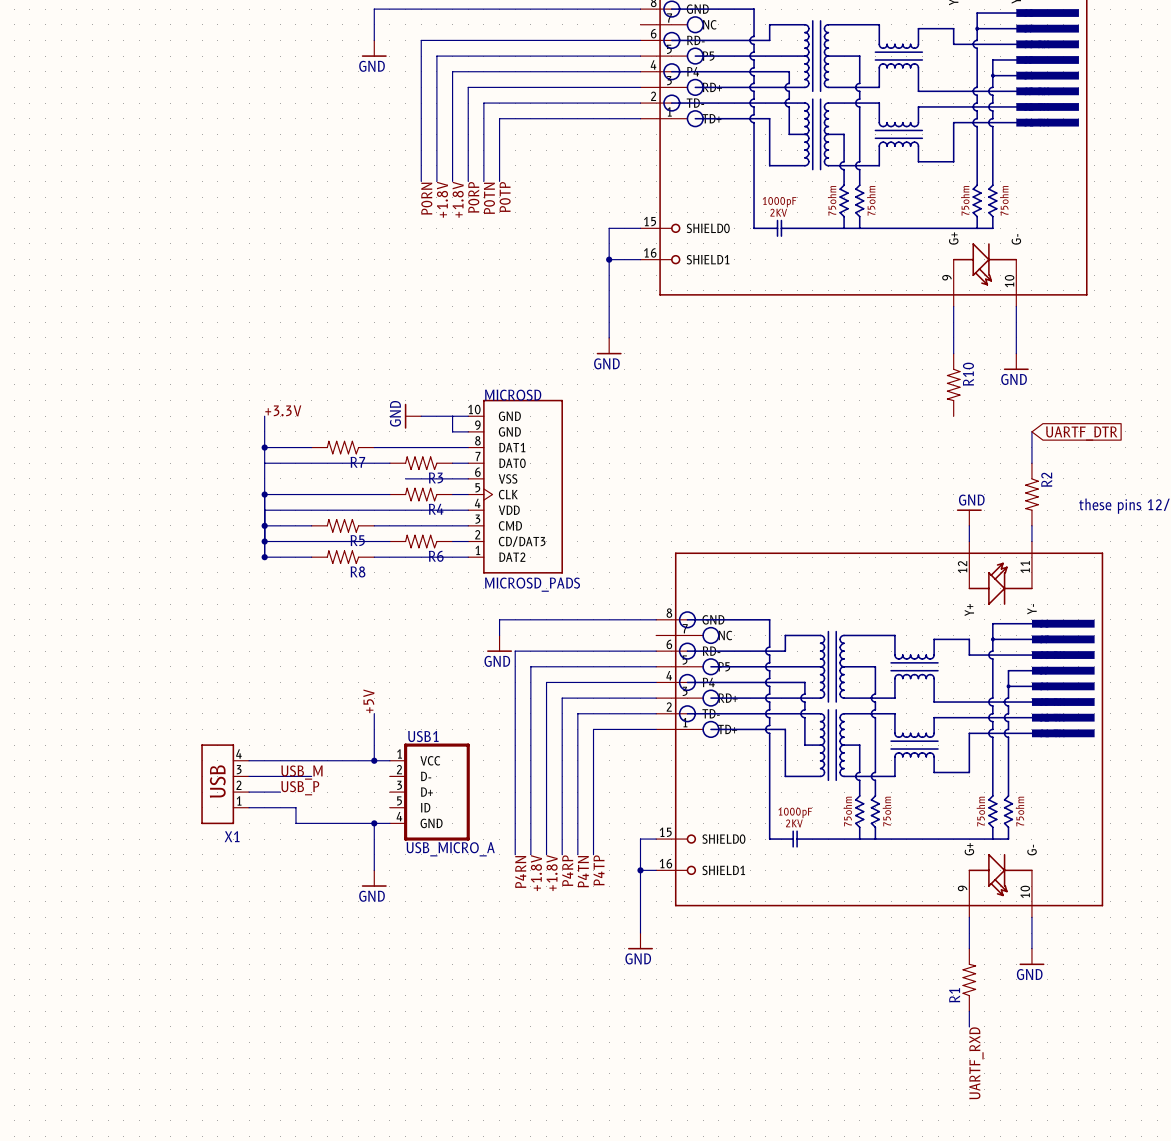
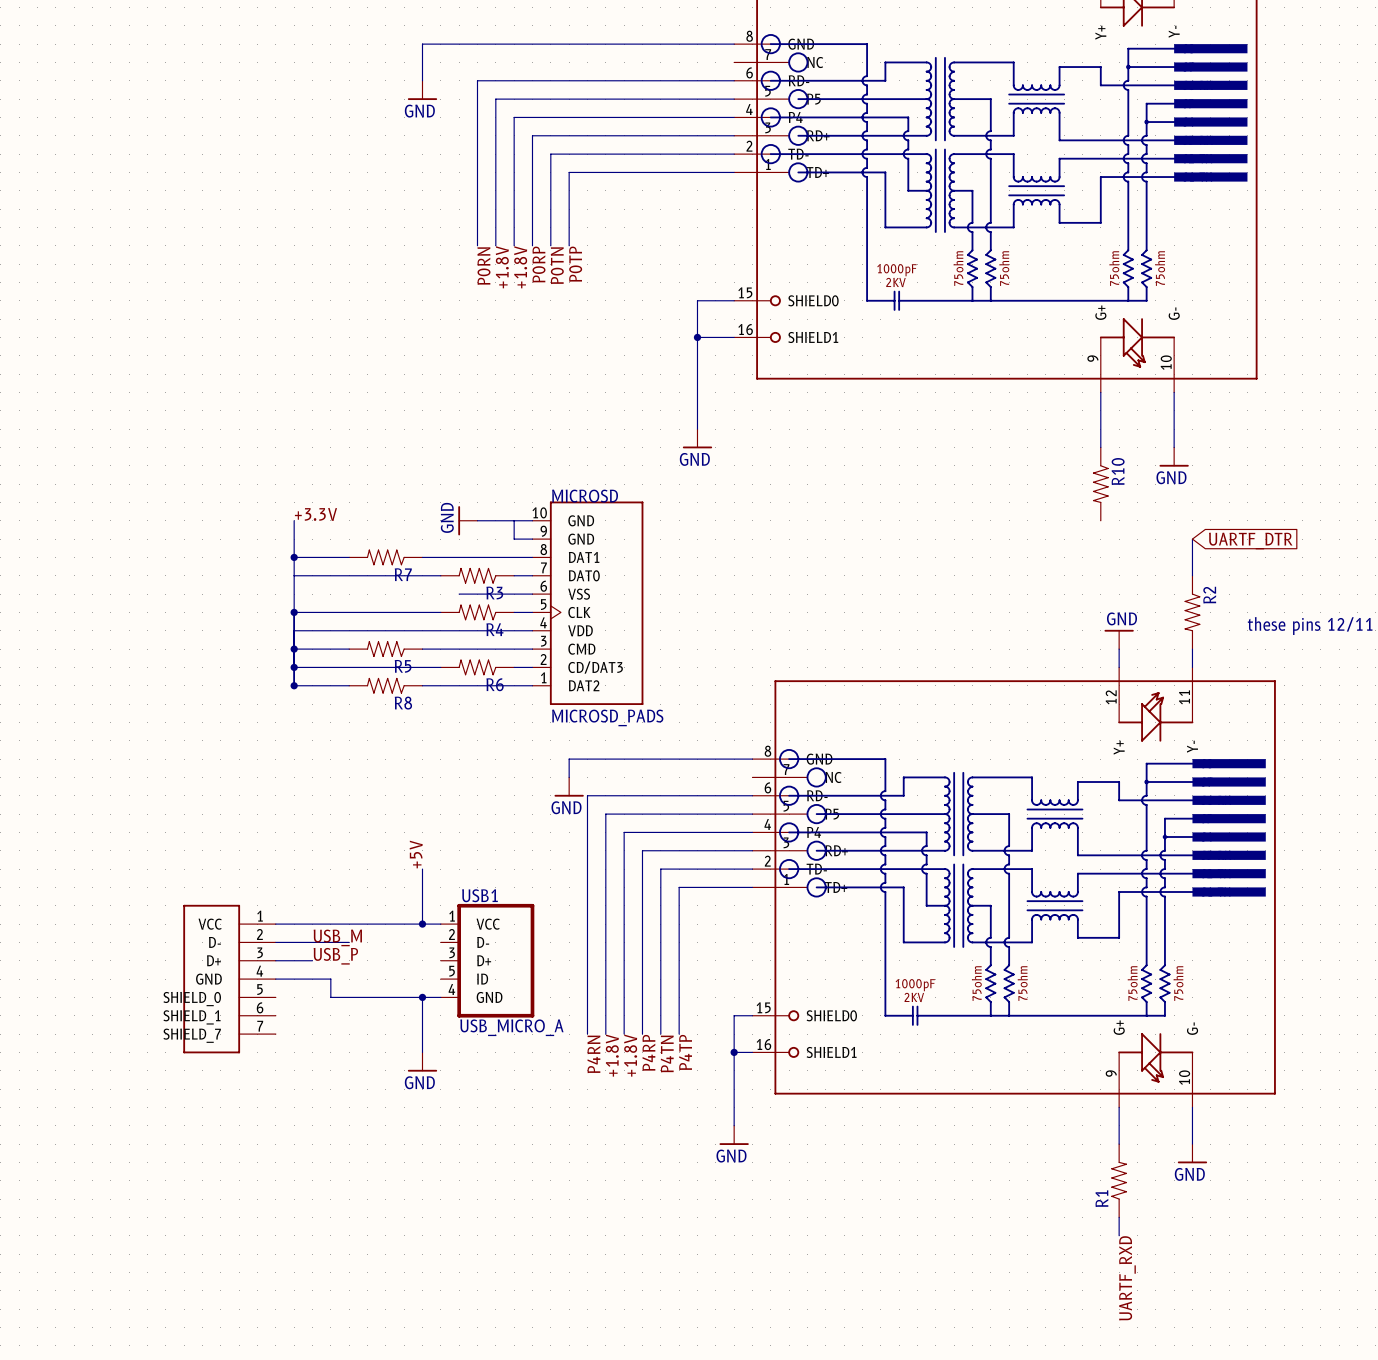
X1: (225, 784) -> none
part: none -> (229, 979)

